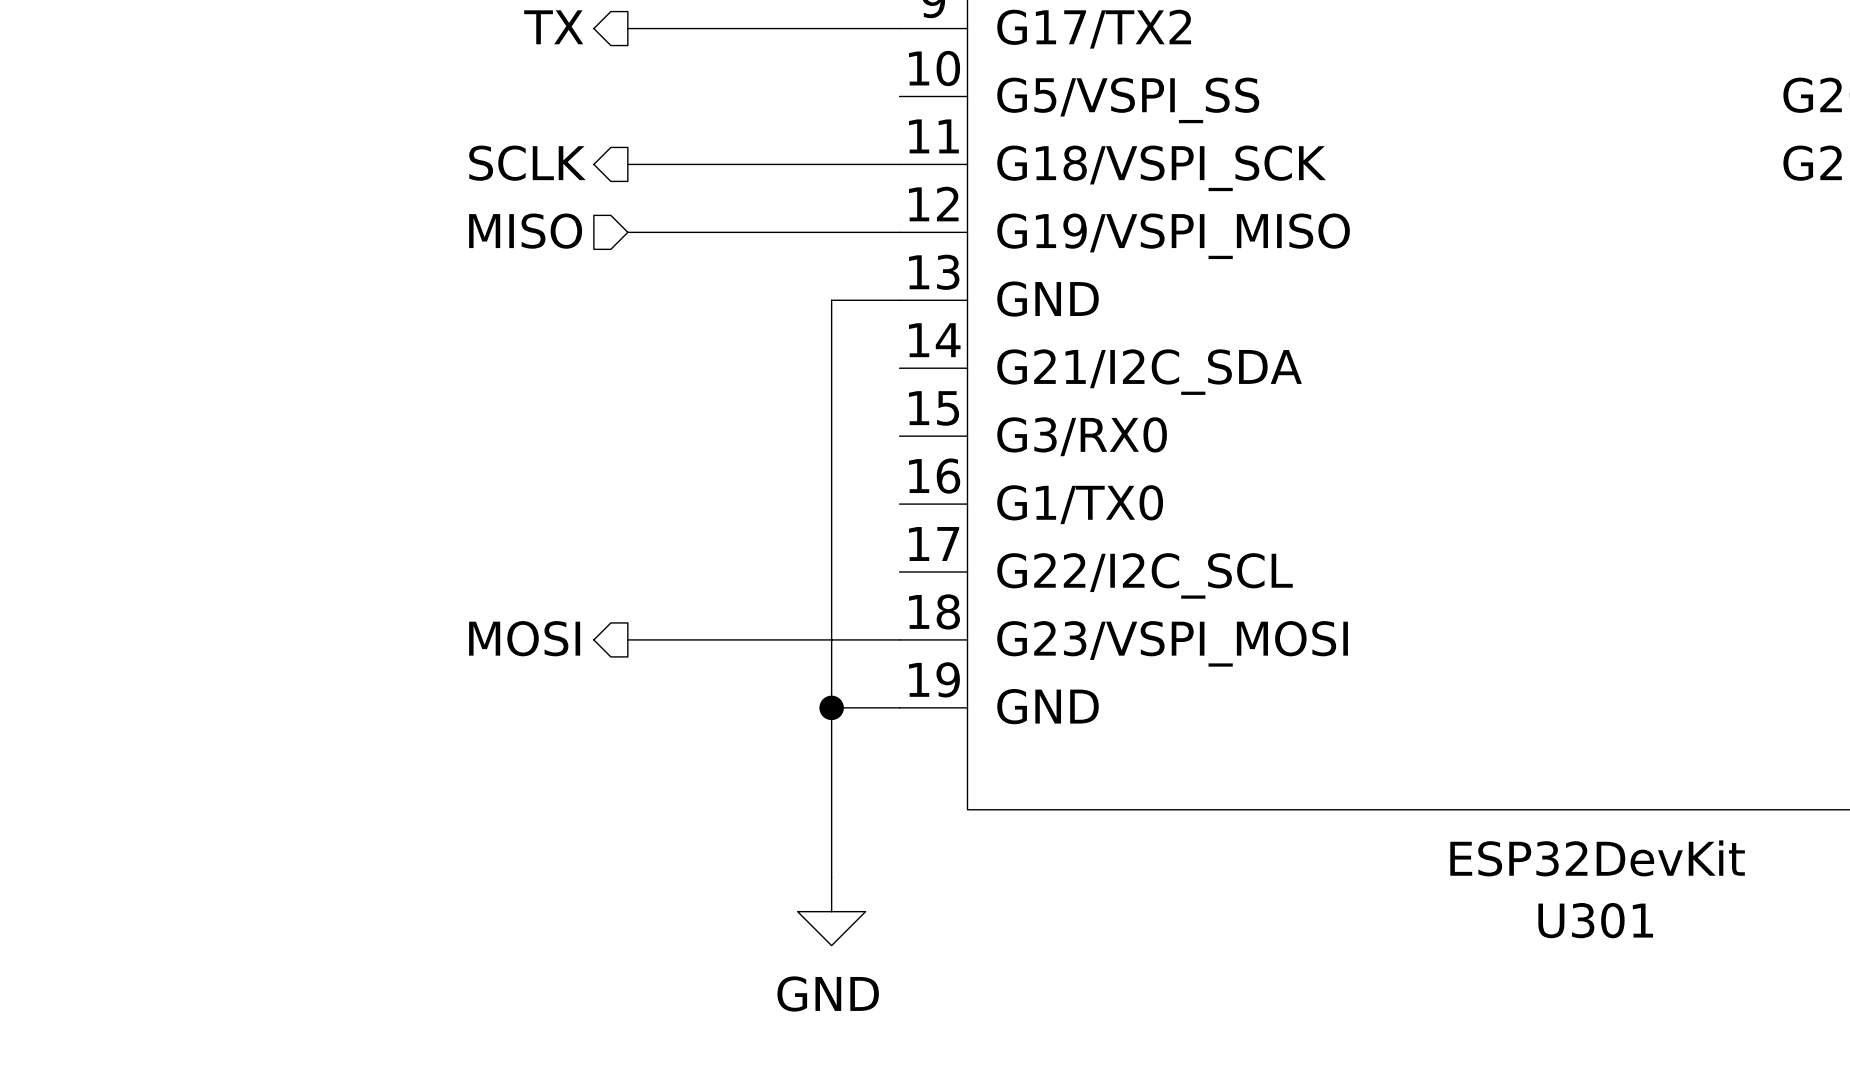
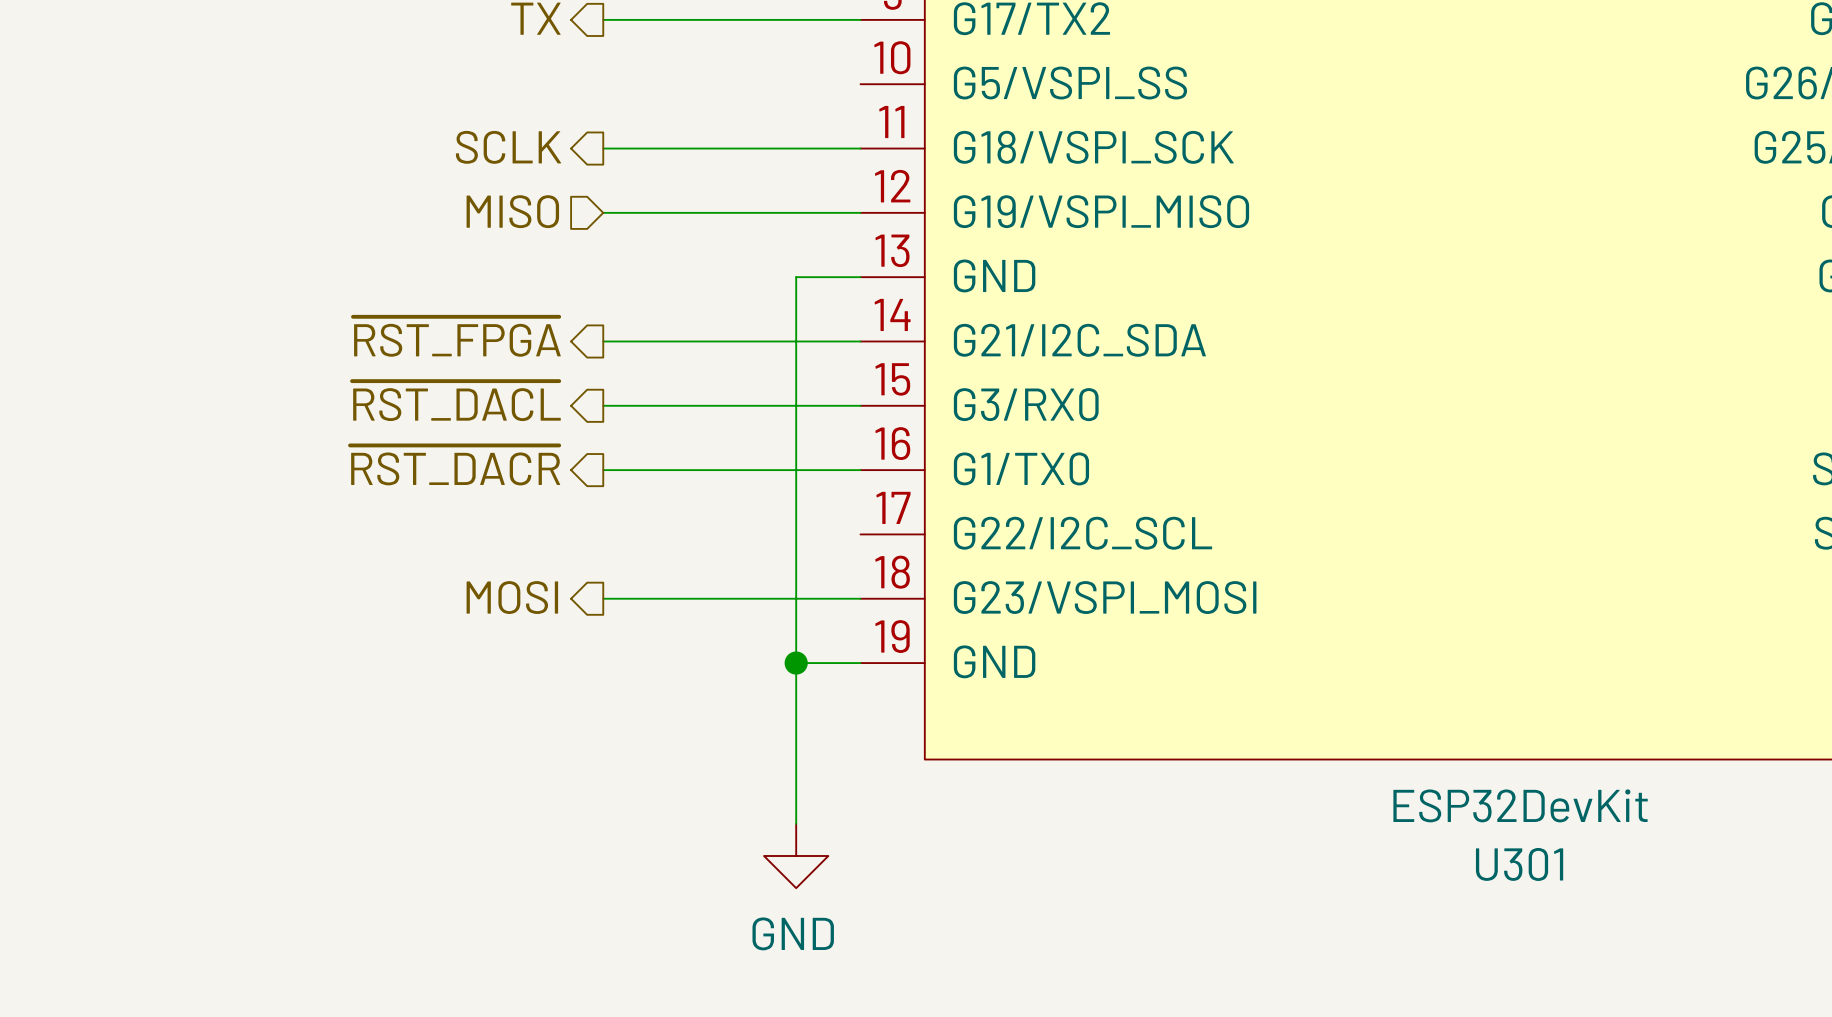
hierarchical label: none -> ~{RST_FPGA} (456, 336)
wire: none -> (603, 341) (860, 341)
hierarchical label: none -> ~{RST_DACL} (456, 401)
wire: none -> (603, 405) (860, 405)
hierarchical label: none -> ~{RST_DACR} (455, 465)
wire: none -> (603, 470) (860, 470)

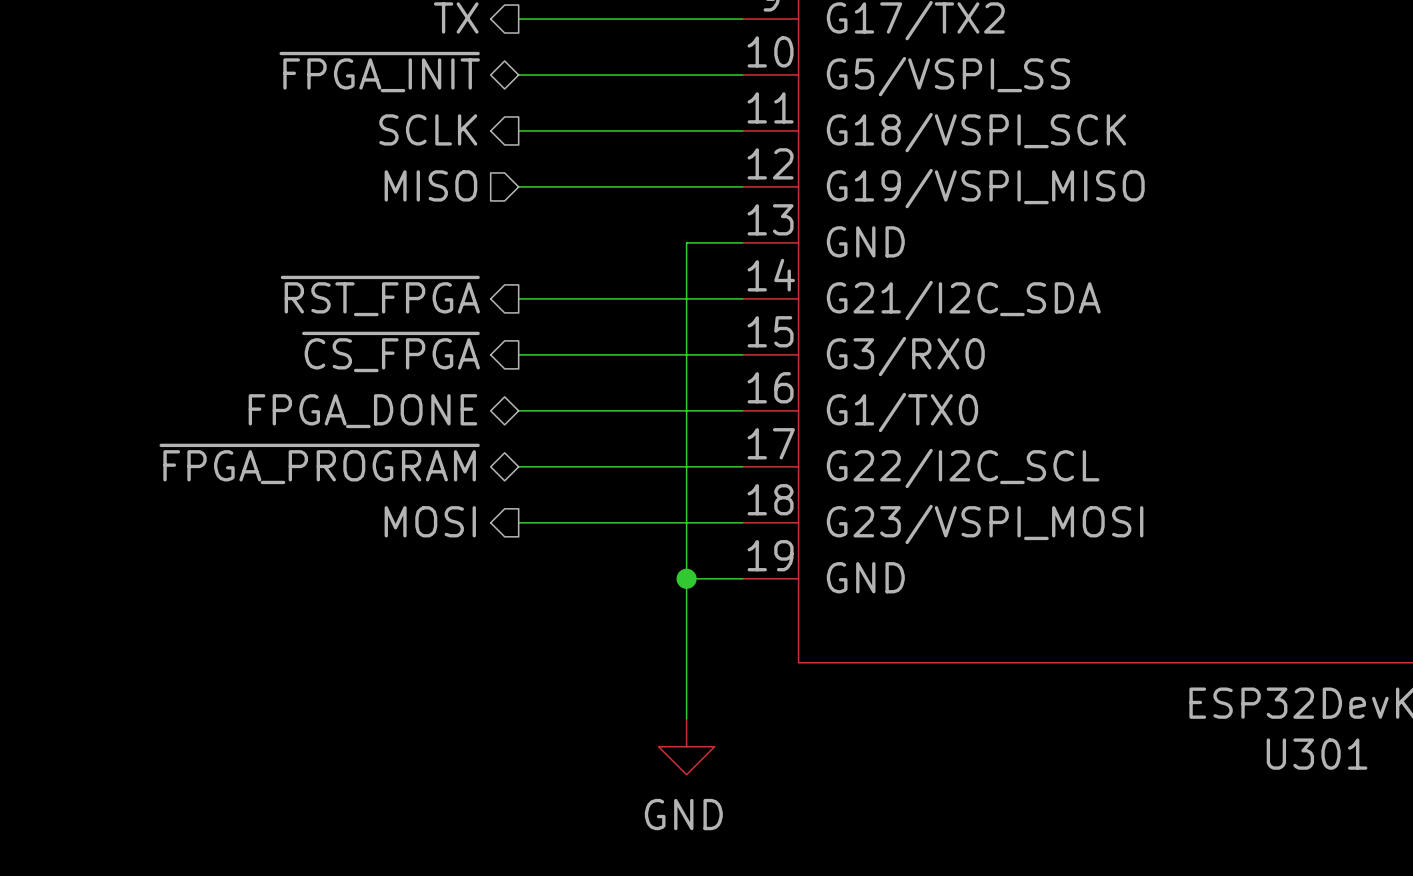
hierarchical label: none -> ~{FPGA_INIT} (379, 72)
wire: none -> (518, 75) (742, 75)
hierarchical label: ~{RST_DACL} (456, 401) -> ~{CS_FPGA} (391, 351)
hierarchical label shape: output (455, 465) -> bidirectional (362, 411)
hierarchical label: ~{RST_DACR} (455, 465) -> FPGA_DONE (362, 411)
hierarchical label: none -> ~{FPGA_PROGRAM} (319, 463)
wire: none -> (518, 466) (742, 466)

